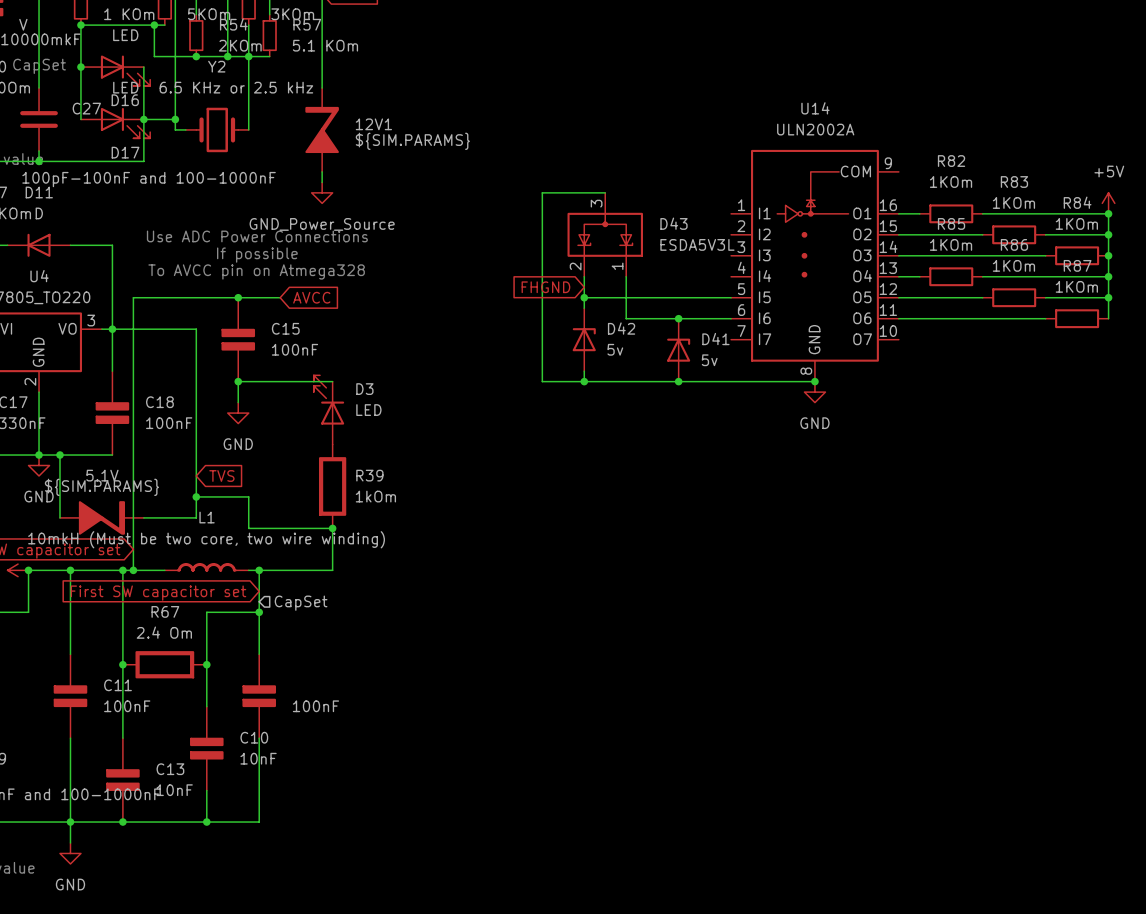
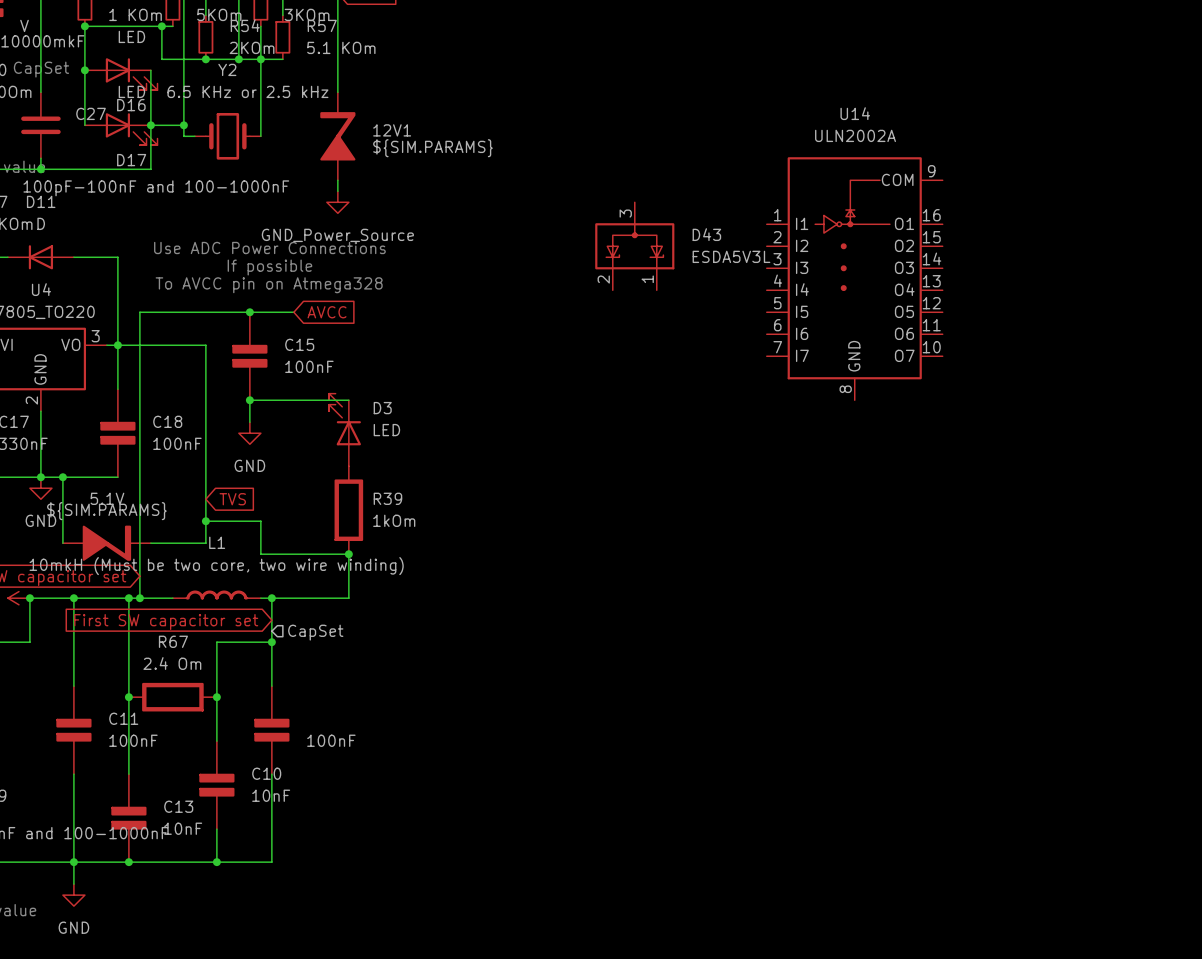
wire: (605, 192) (542, 192) (542, 381) (814, 381) -> none
power symbol: +5V (1108, 203) -> none
wire: (898, 213) (919, 213) -> none
R82: 1KOm (951, 213) -> none
wire: (982, 213) (1108, 213) (1108, 318) -> none
junction: (1108, 213) -> none
wire: (898, 234) (982, 234) -> none
R83: 1KOm (1014, 234) -> none
wire: (1045, 234) (1108, 234) -> none
junction: (1108, 234) -> none
wire: (898, 255) (1045, 255) -> none
R84: 1KOm (1077, 255) -> none
junction: (1108, 255) -> none
wire: (584, 276) (584, 308) -> none
wire: (626, 276) (626, 318) (731, 318) -> none
wire: (898, 276) (919, 276) -> none
R85: 1KOm (951, 276) -> none
wire: (982, 276) (1108, 276) -> none
junction: (1108, 276) -> none
global label: FHGND (545, 287) -> none
wire: (584, 297) (731, 297) -> none
junction: (584, 297) -> none
wire: (898, 297) (982, 297) -> none
R86: 1KOm (1014, 297) -> none
wire: (1045, 297) (1108, 297) -> none
junction: (1108, 297) -> none
junction: (678, 318) -> none
wire: (898, 318) (1045, 318) -> none
R87: 1KOm (1077, 318) -> none
D42: 5v (584, 339) -> none
D41: 5v (678, 350) -> none
wire: (584, 371) (584, 381) -> none
junction: (584, 381) -> none
junction: (678, 381) -> none
junction: (814, 381) -> none
power symbol: GND (814, 392) -> none

